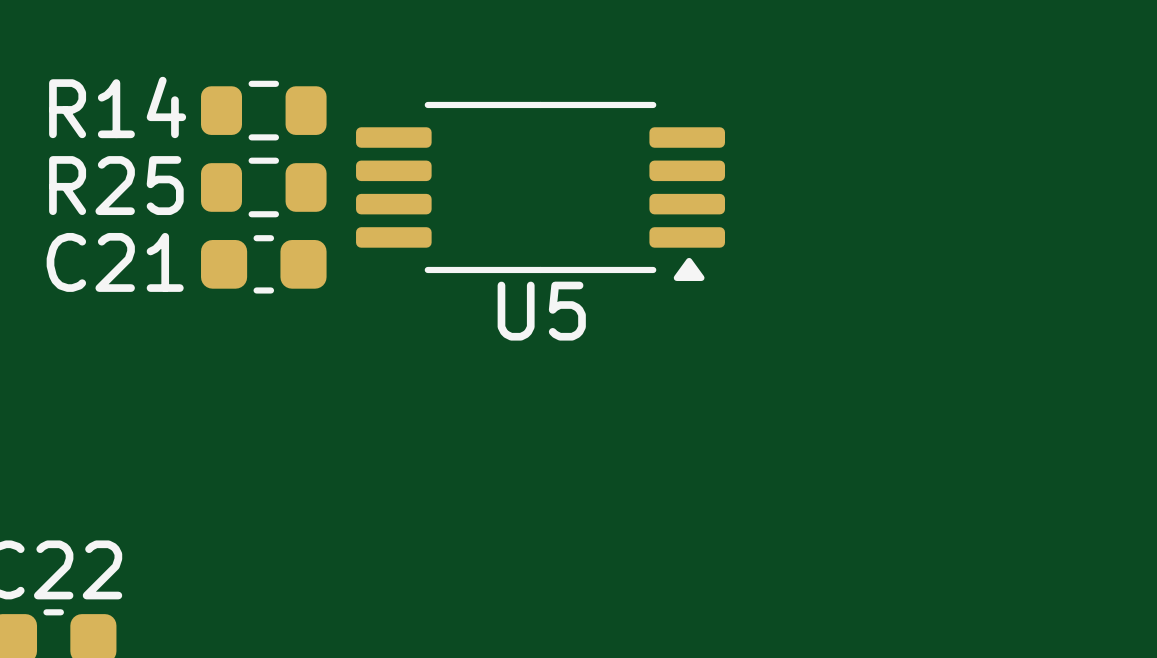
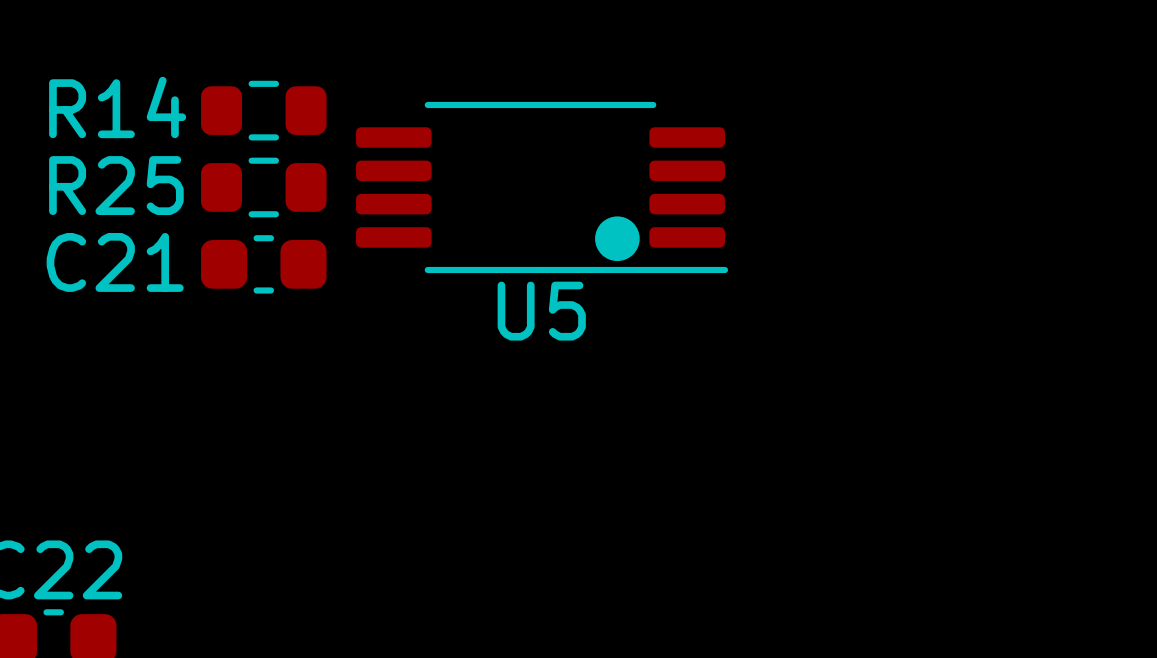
U5 footprint: [356, 101, 726, 282] -> [356, 101, 729, 274]
drawing: none -> [595, 216, 640, 262]

